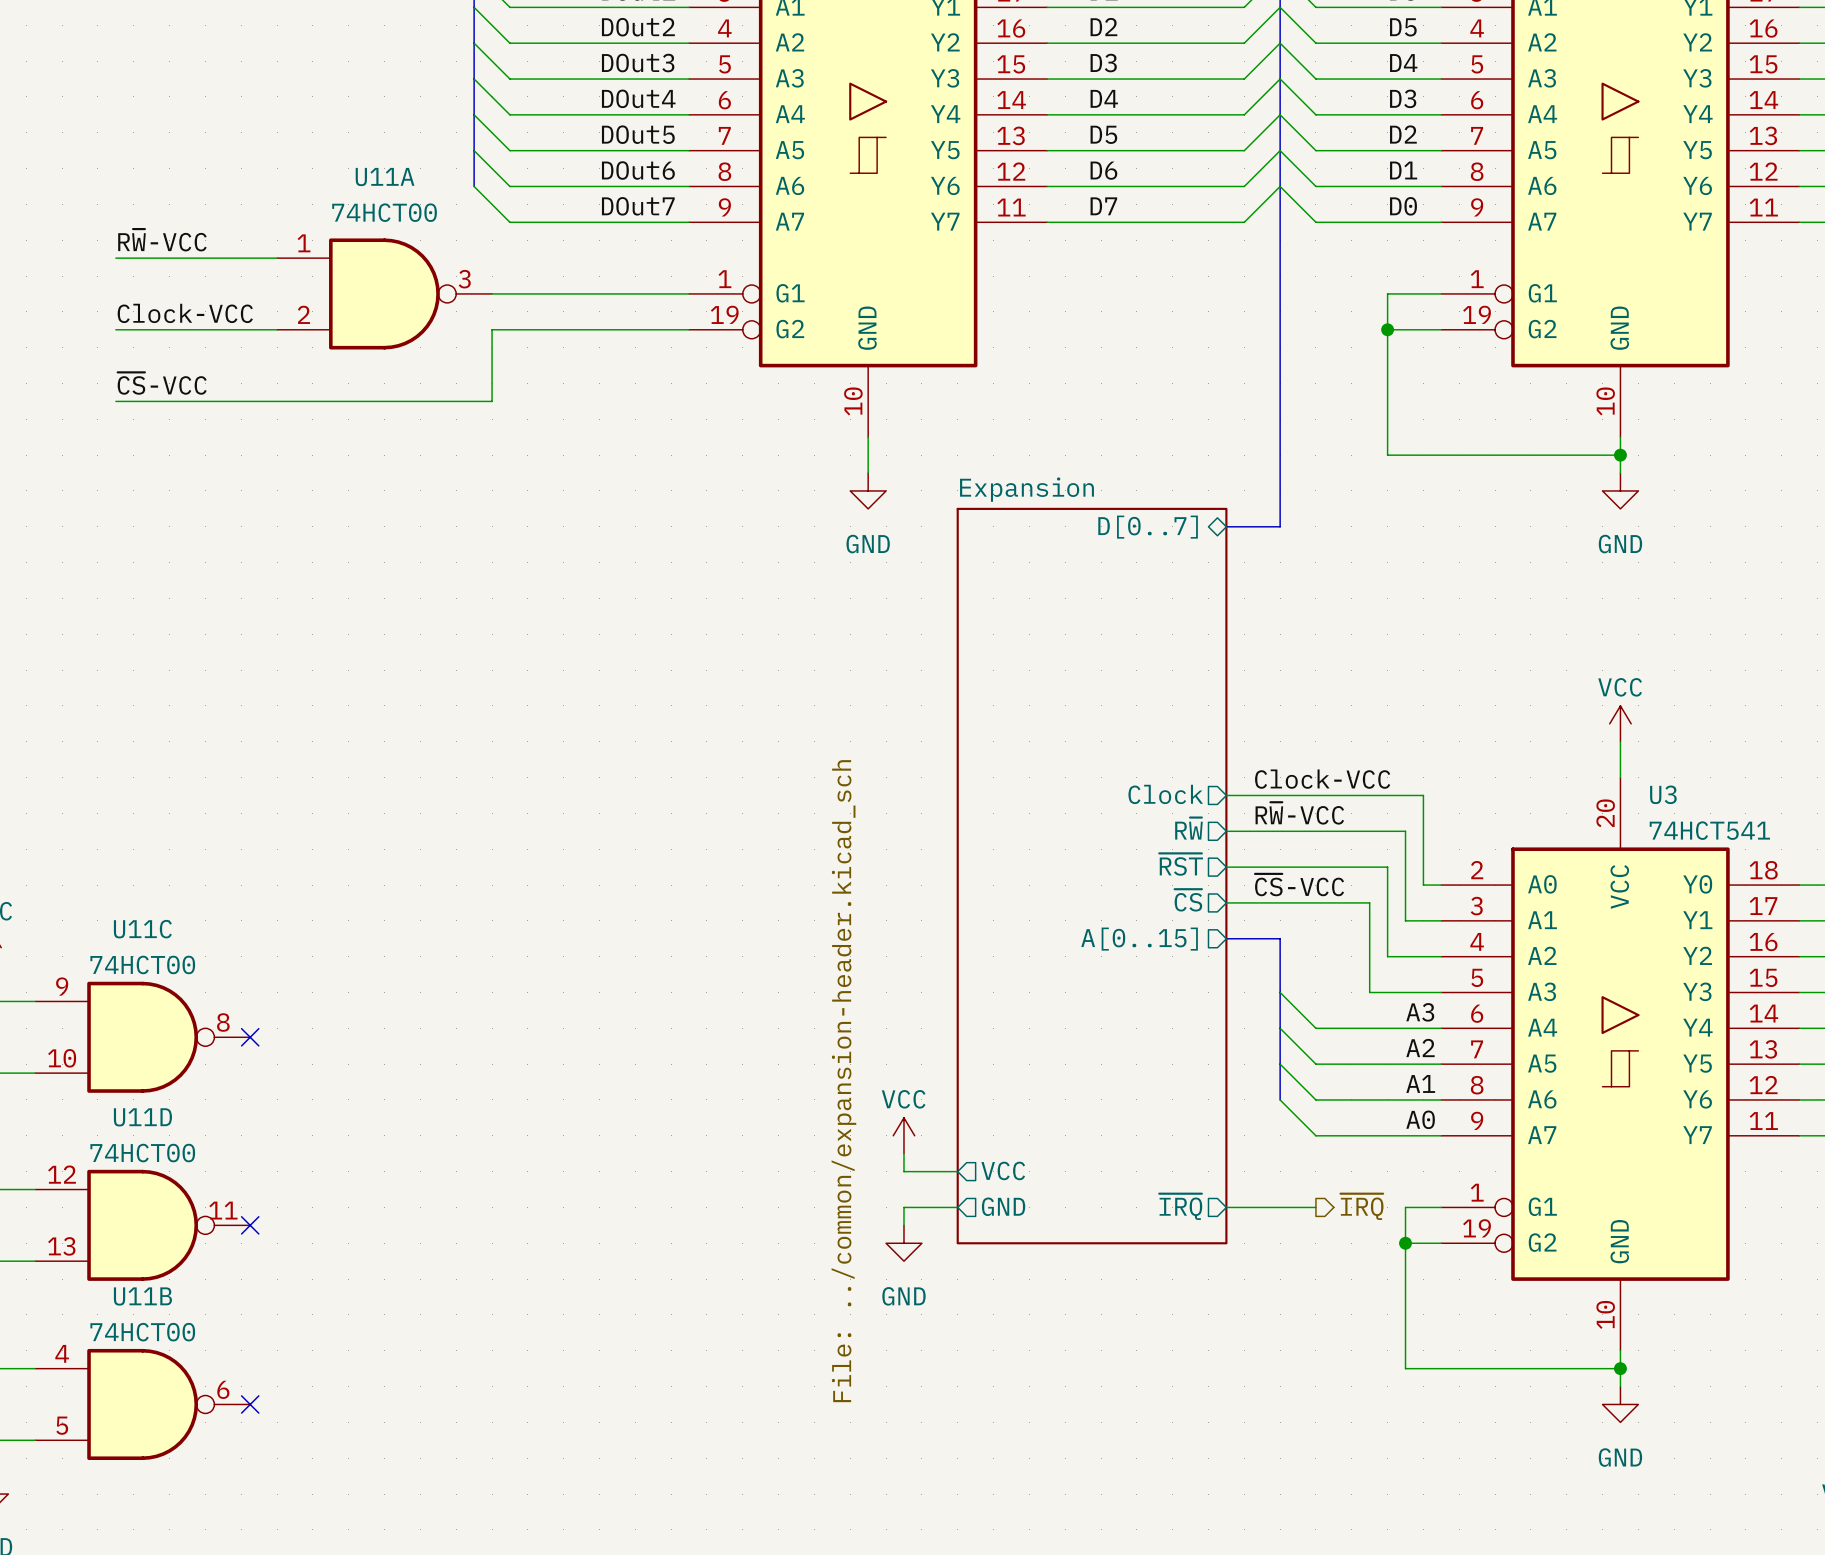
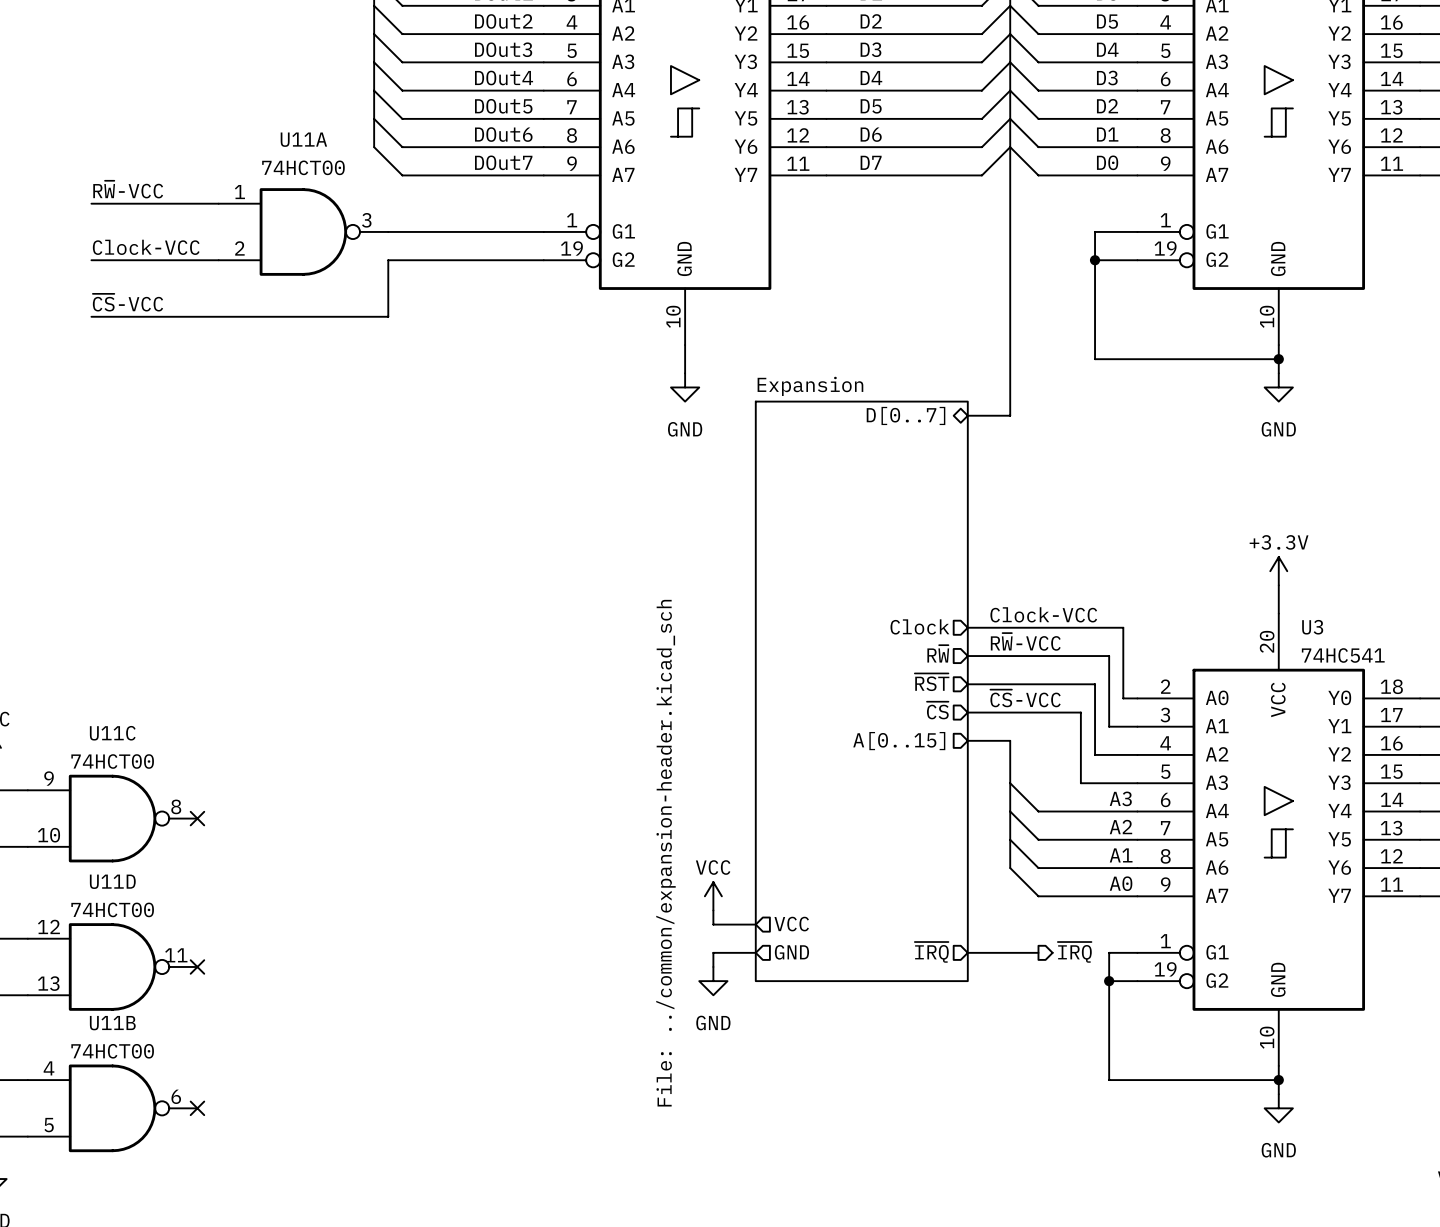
power symbol: VCC (1620, 723) -> +3.3V (1278, 571)
U3 value: 74HCT541 (1709, 830) -> 74HC541 (1343, 655)

